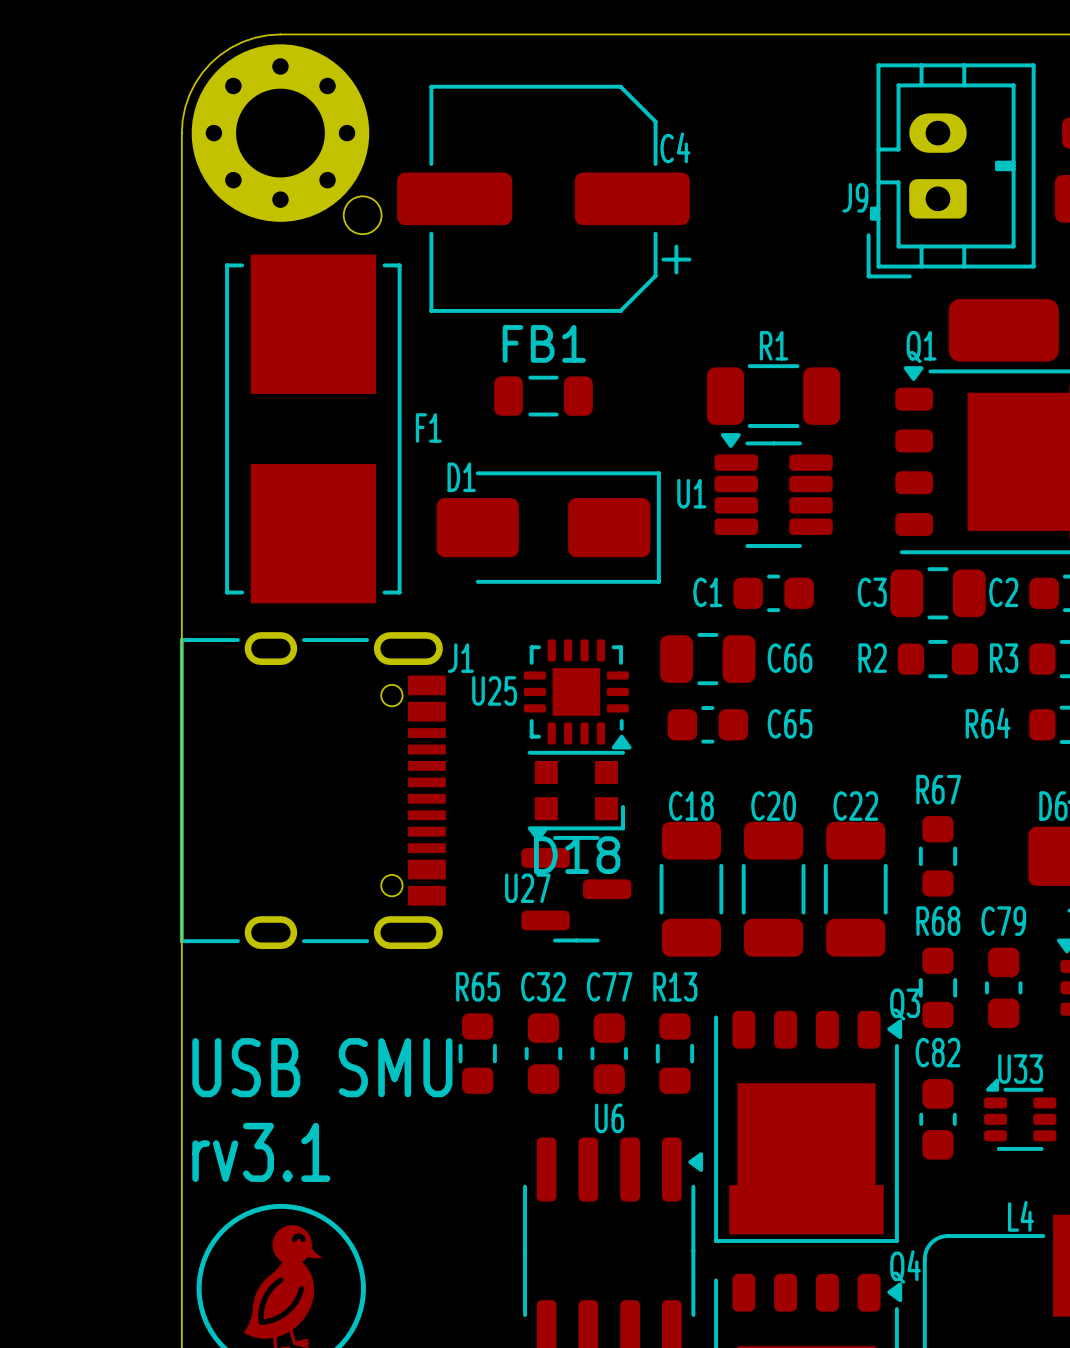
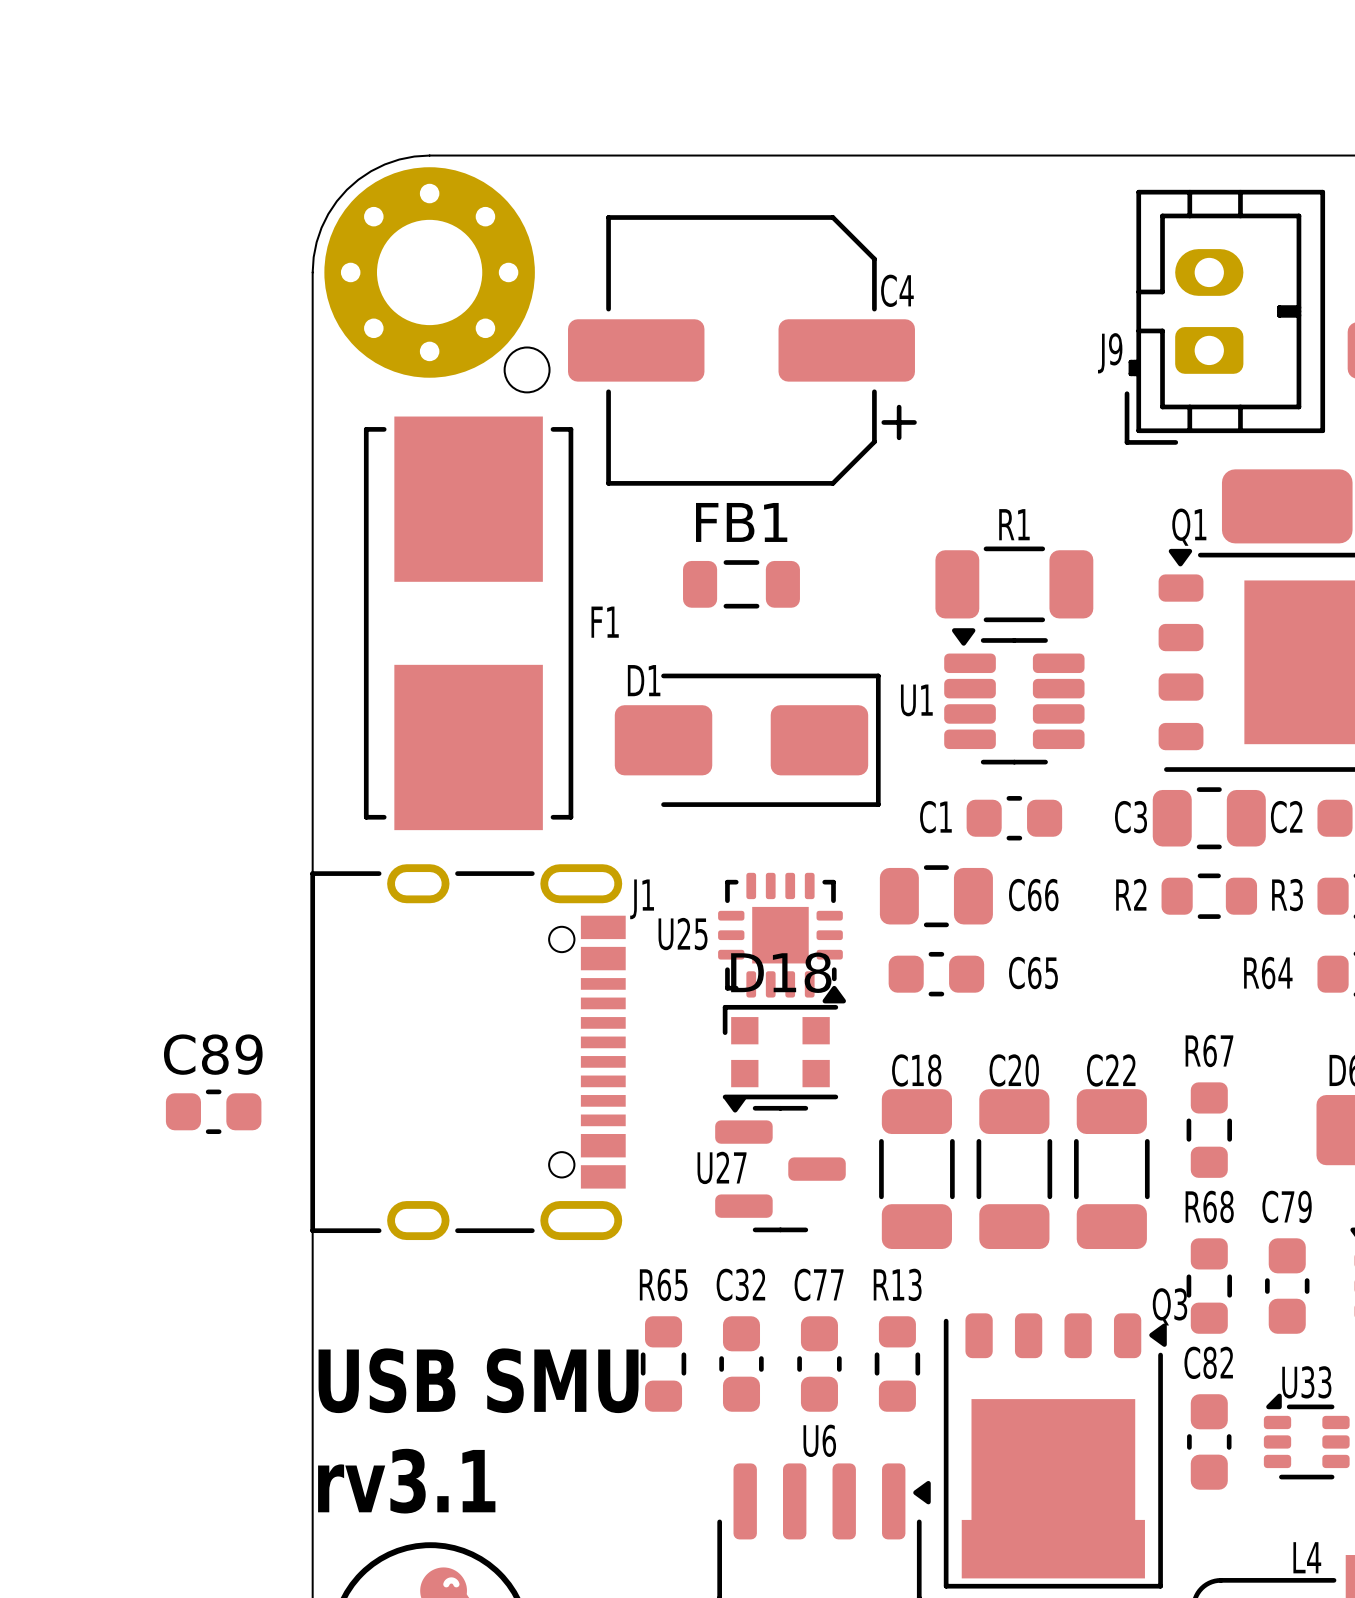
D18 rotation: 0° (576, 790) -> 180° (780, 1052)
C89: none -> (213, 1111)

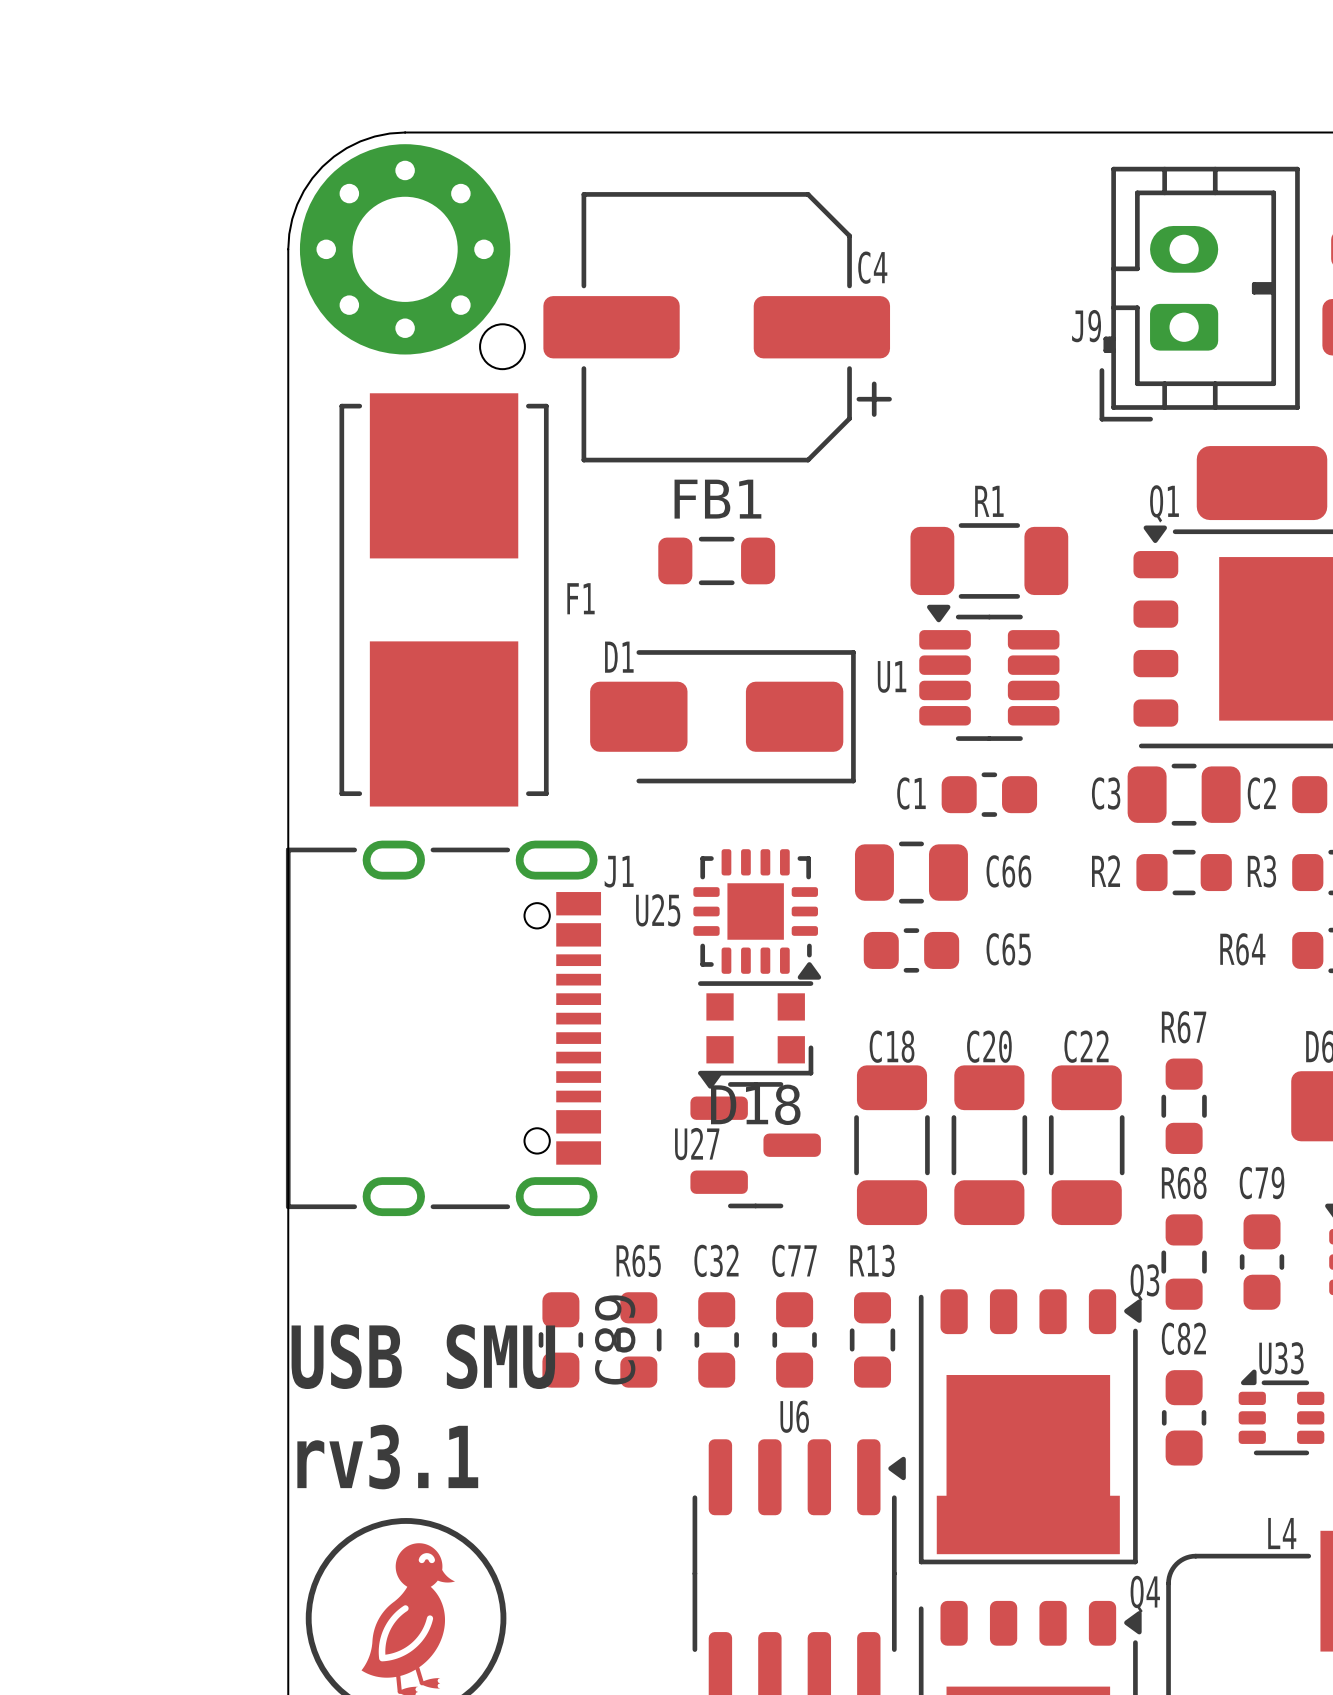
D18 rotation: 0° (780, 1052) -> 180° (755, 1028)
C89 rotation: 0° (213, 1111) -> 90° clockwise (560, 1339)
C89 position: (213, 1111) -> (560, 1339)

